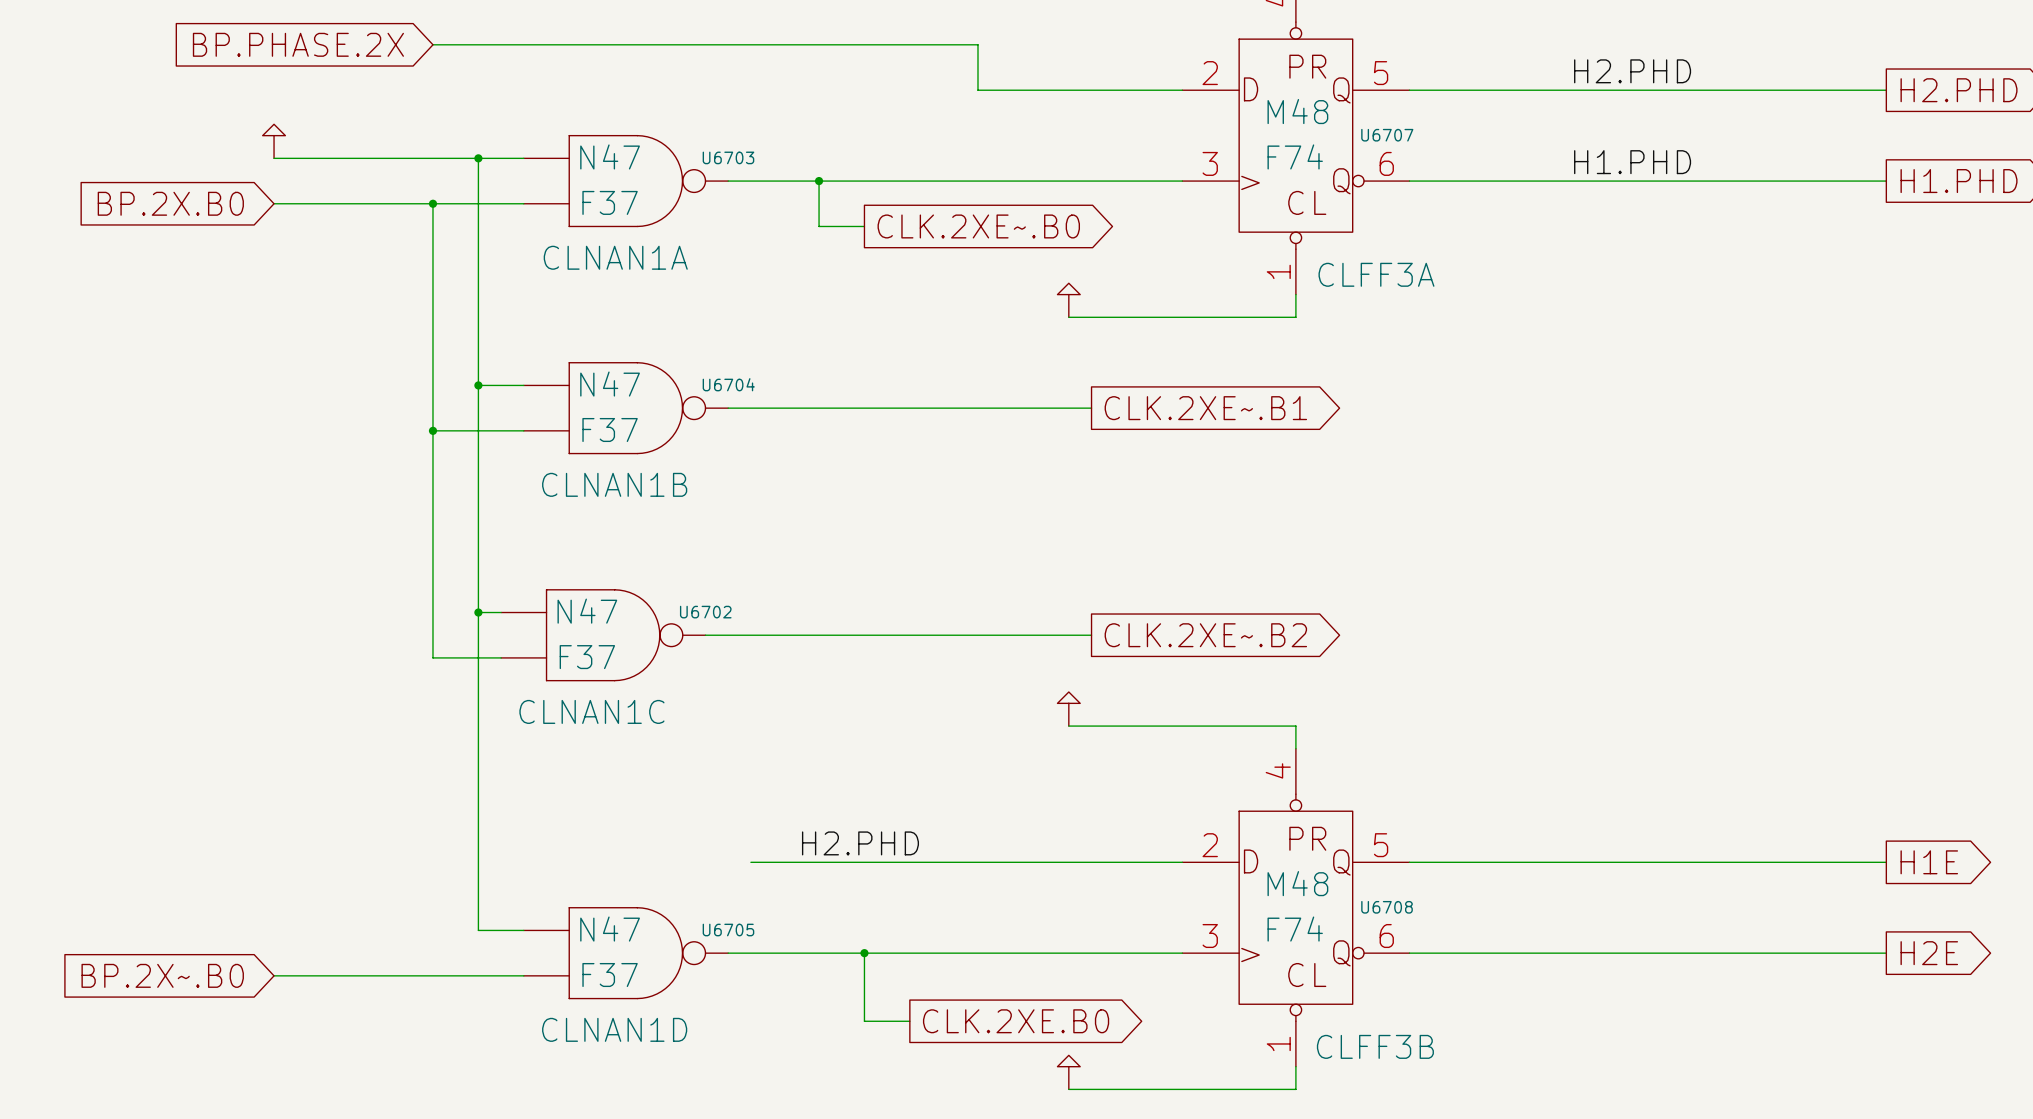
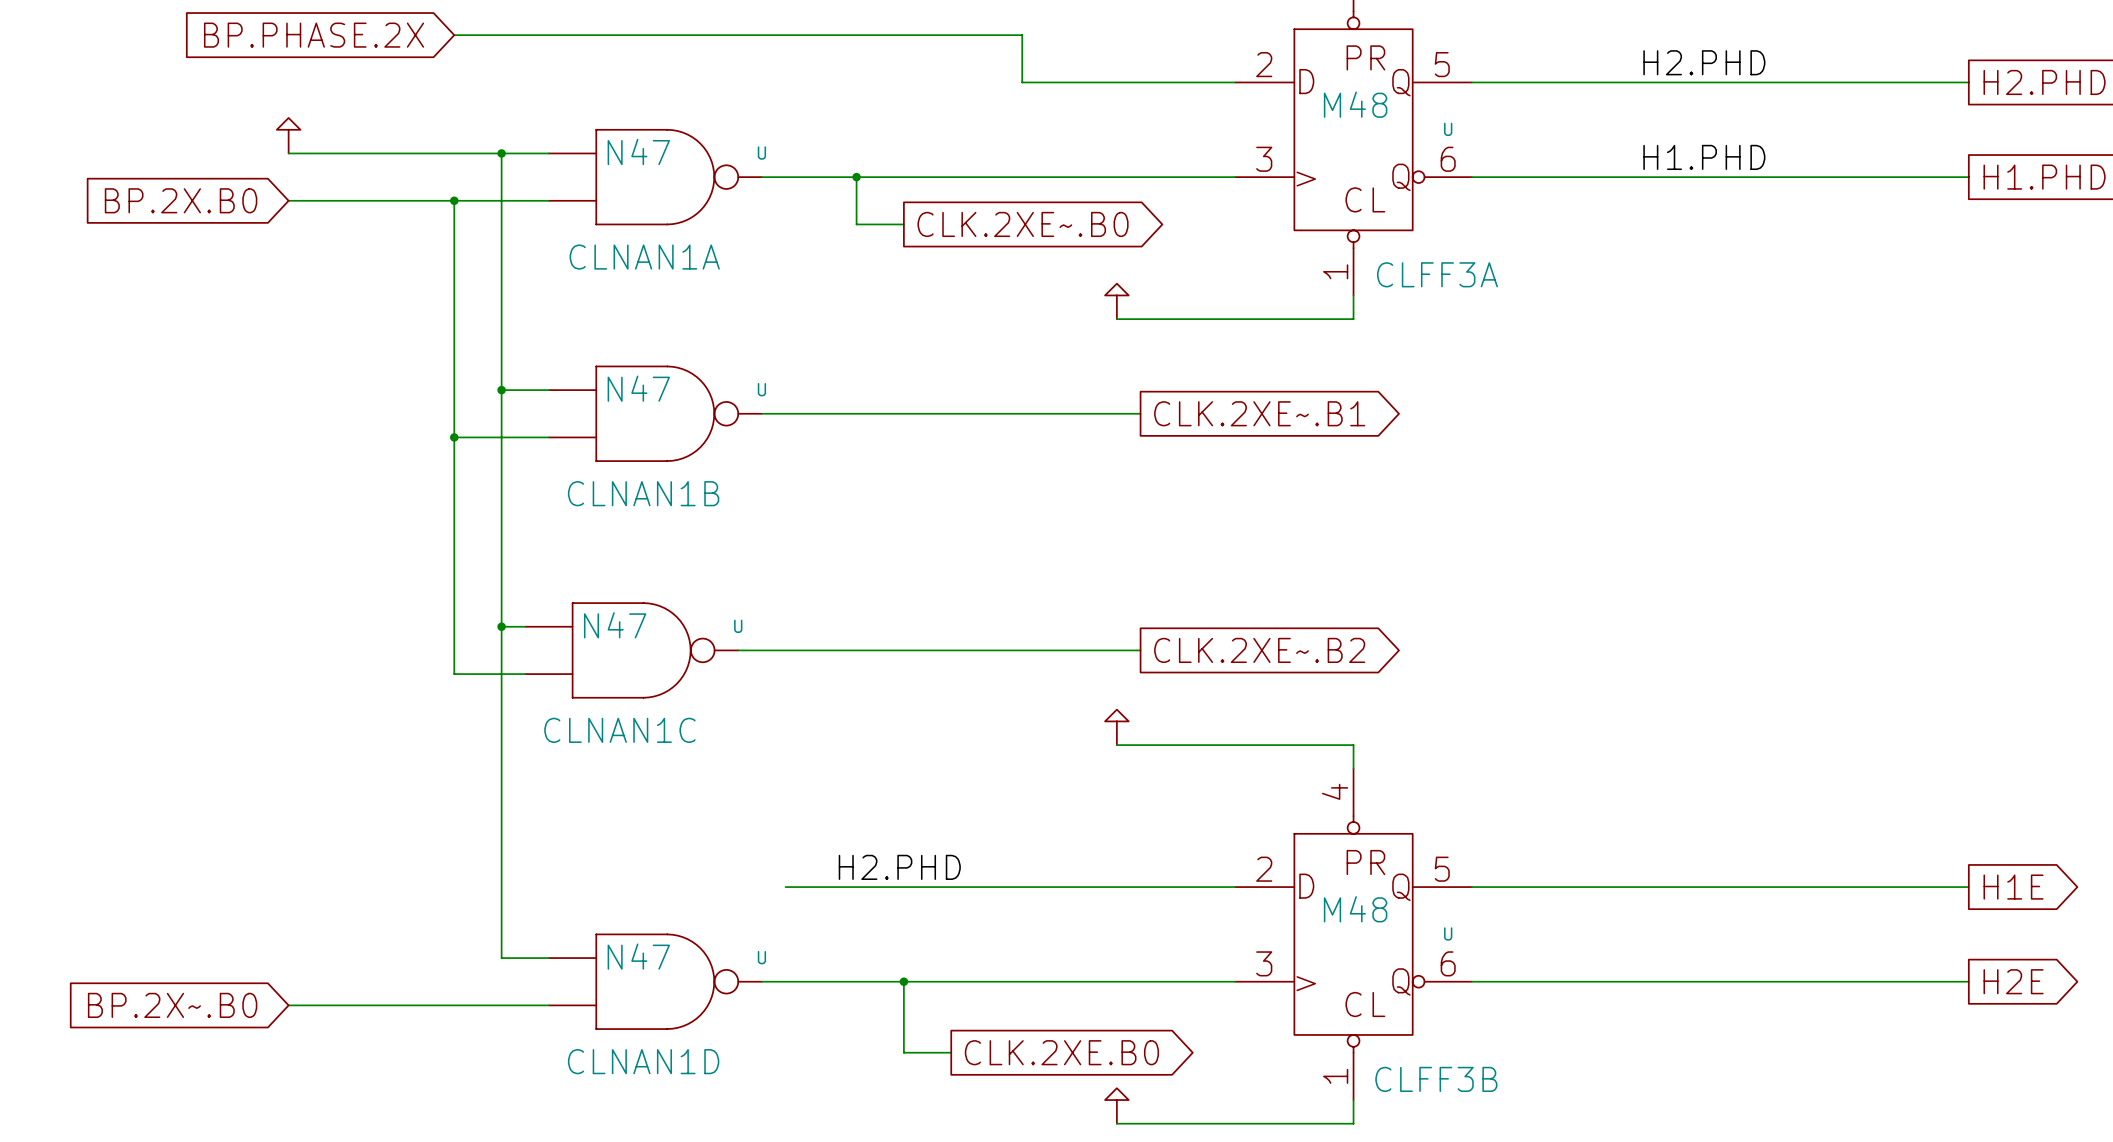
U6707 name: U6707 (1387, 135) -> U (1448, 129)
U6707 value: F74 (1295, 156) -> none
U6703 name: U6703 (728, 157) -> U (761, 153)
U6703 value: F37 (610, 202) -> none
U6704 name: U6704 (728, 384) -> U (761, 389)
U6704 value: F37 (610, 430) -> none
U6702 name: U6702 (705, 612) -> U (738, 626)
U6702 value: F37 (587, 657) -> none
U6708 name: U6708 (1387, 907) -> U (1448, 933)
U6708 value: F74 (1295, 929) -> none
U6705 name: U6705 (728, 930) -> U (761, 957)
U6705 value: F37 (610, 975) -> none

